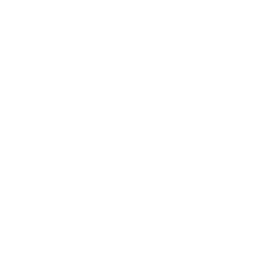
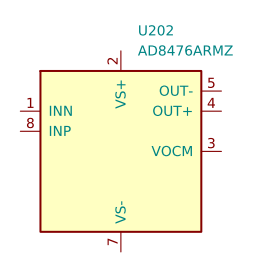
U202: none -> AD8476ARMZ (120, 151)

